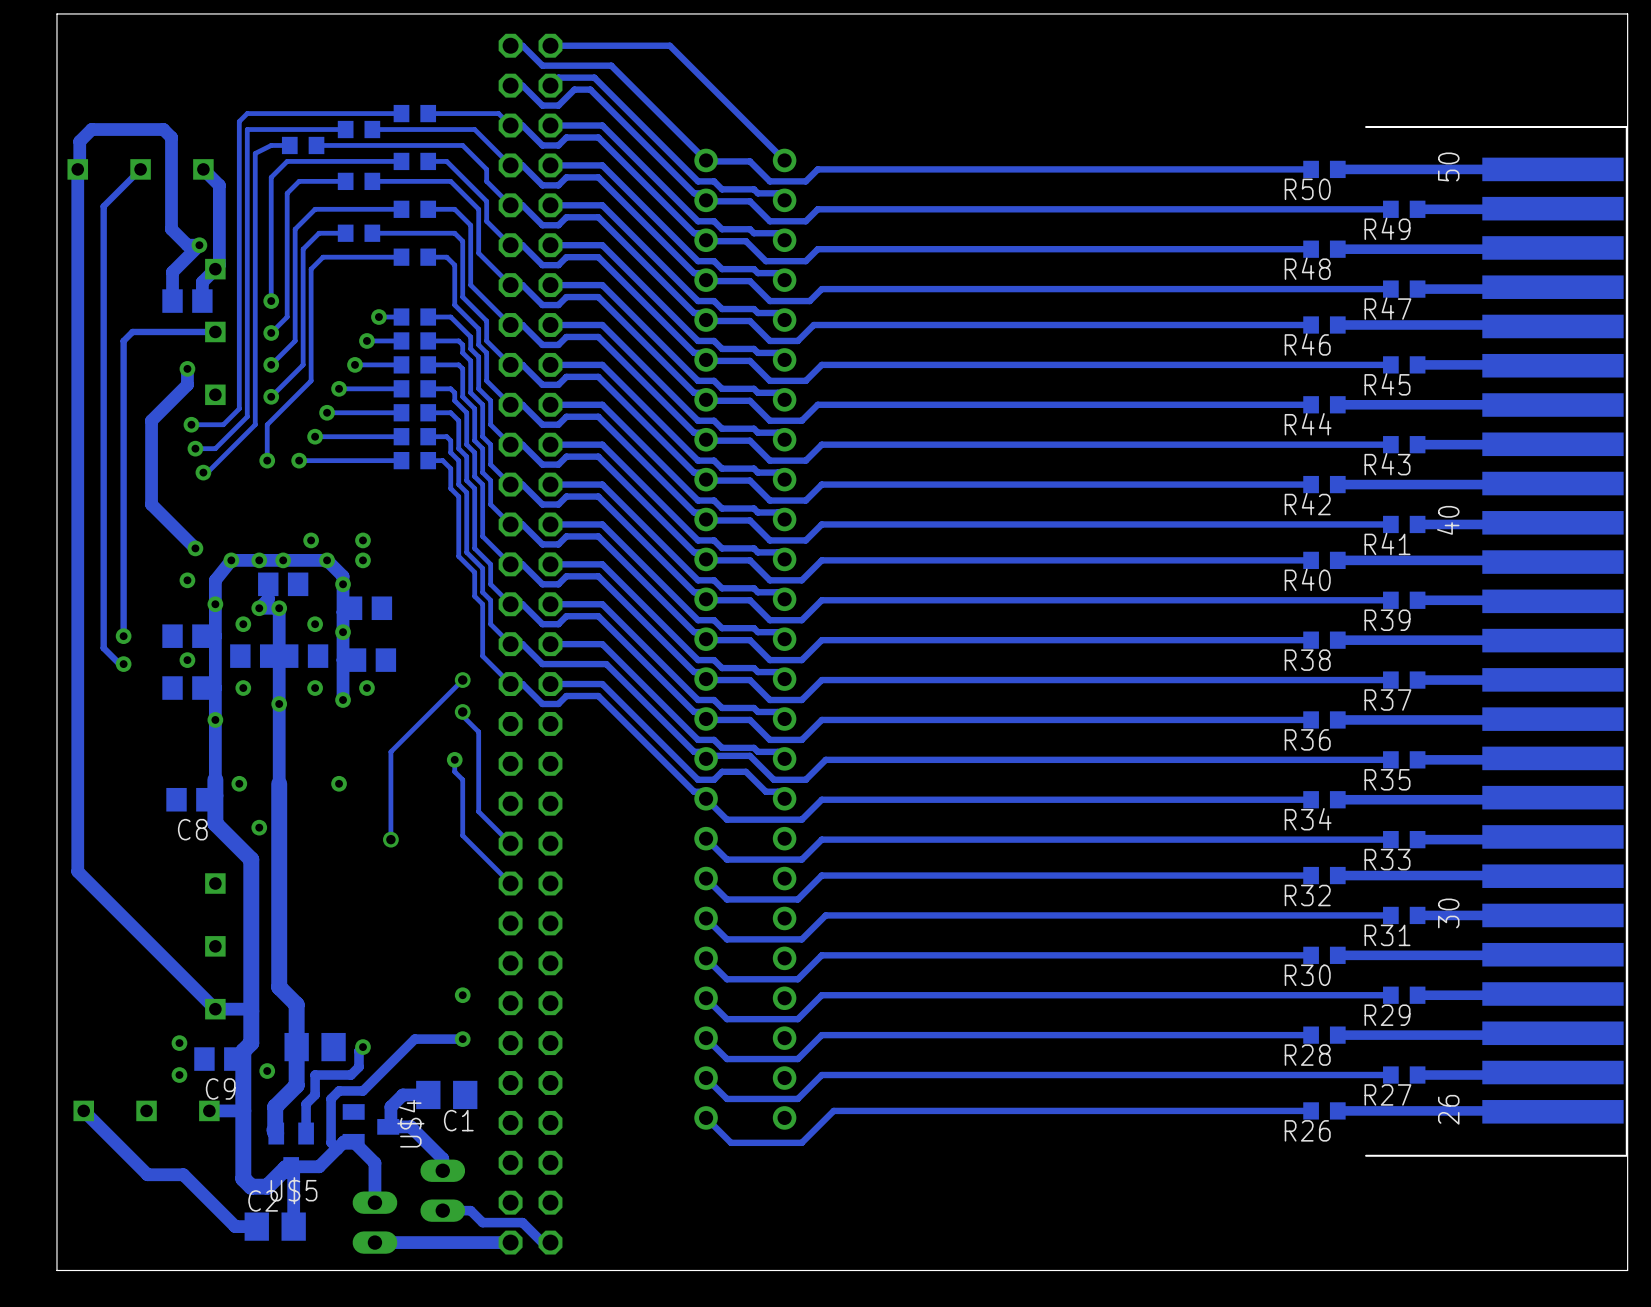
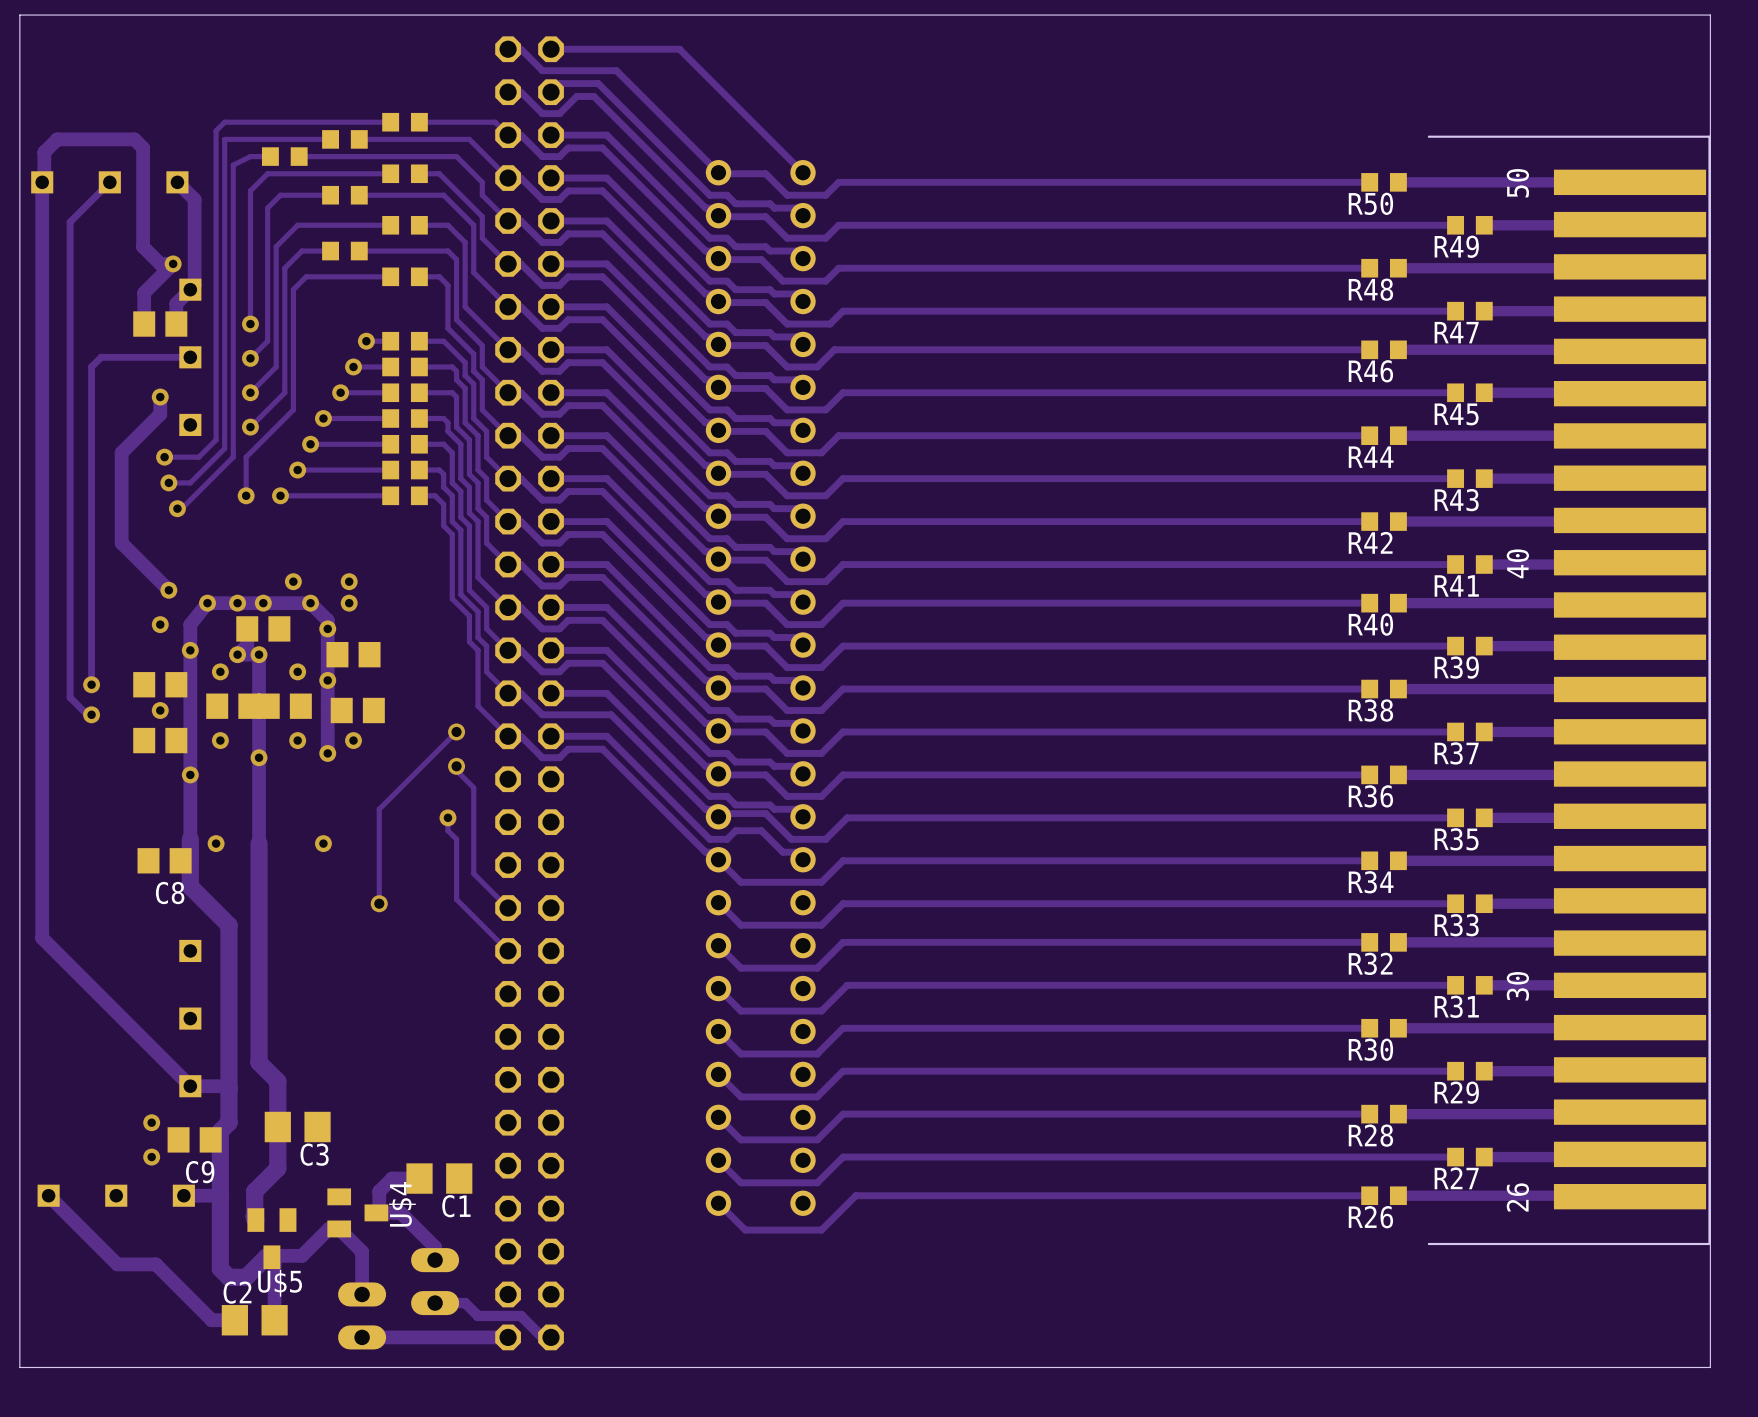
via: (259, 827) -> none
via: (462, 995) -> none
track: (462, 1039) (414, 1039) (362, 1090) (339, 1090) (331, 1098) (331, 1142) (337, 1148) -> none
via: (462, 1039) -> none
track: (362, 1047) (358, 1051) (358, 1067) (351, 1075) (315, 1075) (315, 1094) (306, 1103) (306, 1133) -> none
via: (362, 1047) -> none
via: (267, 1071) -> none
C3 name: none -> C3 (314, 1154)

